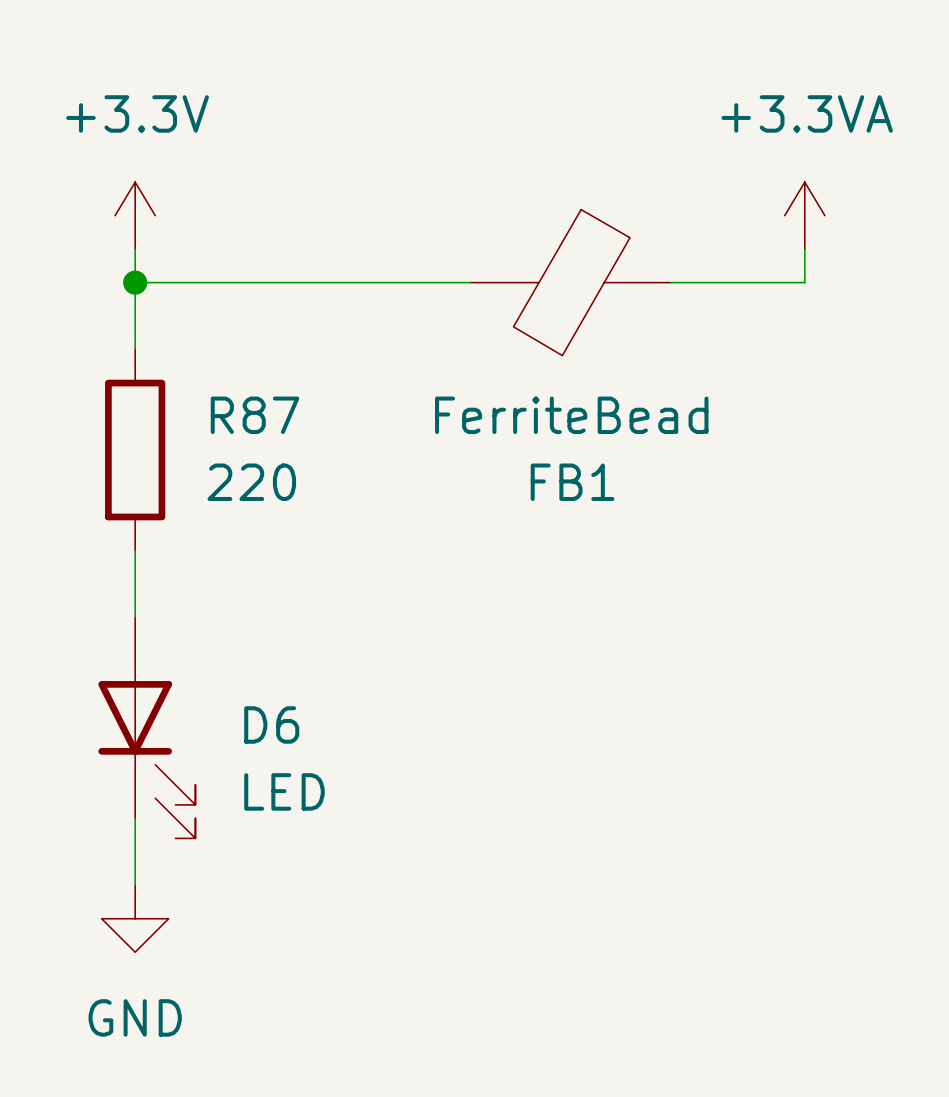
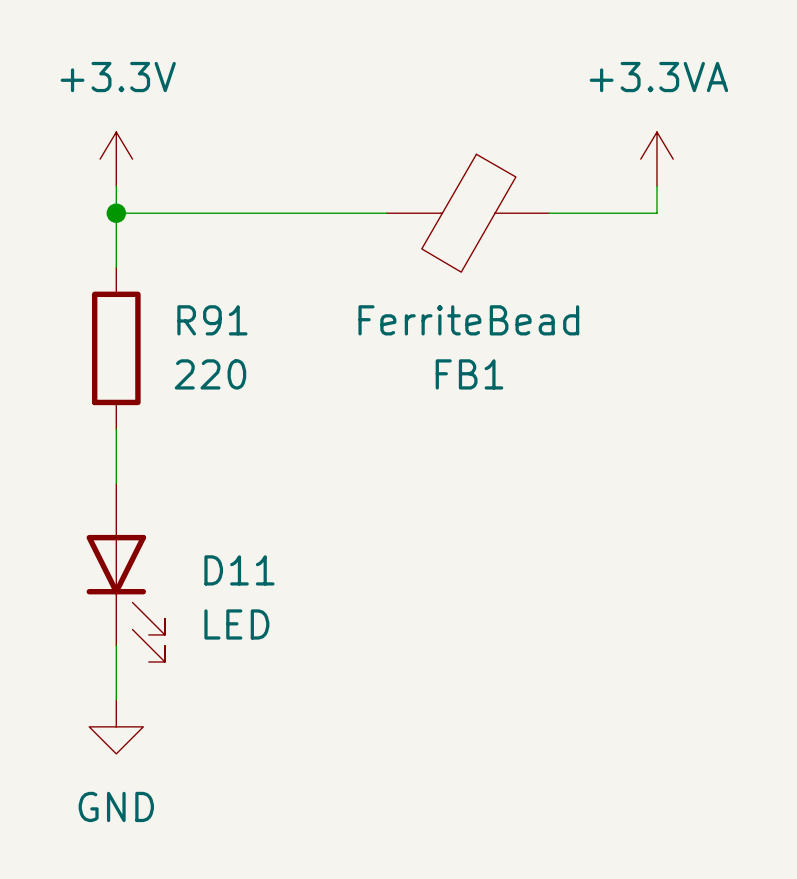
R87 name: R87 (255, 415) -> R91 (212, 320)
D6 name: D6 (271, 724) -> D11 (239, 570)

